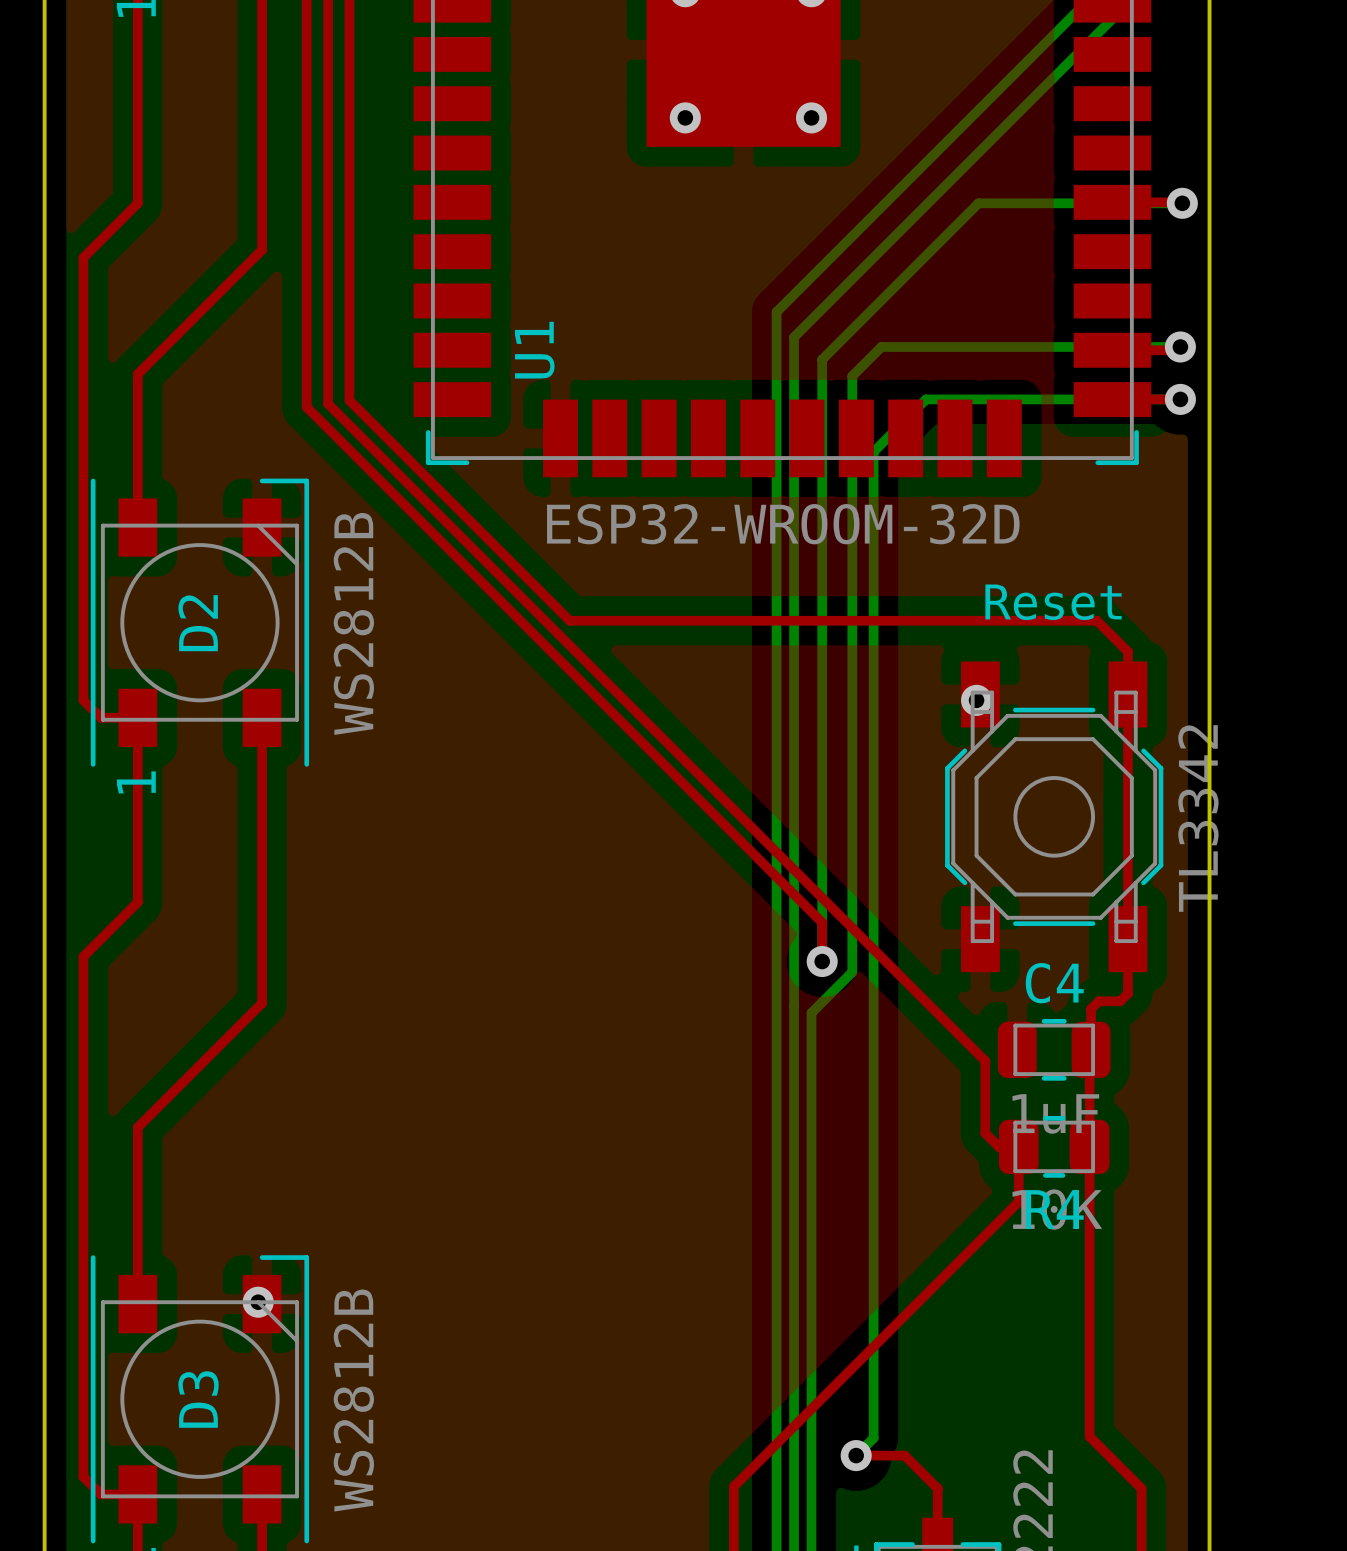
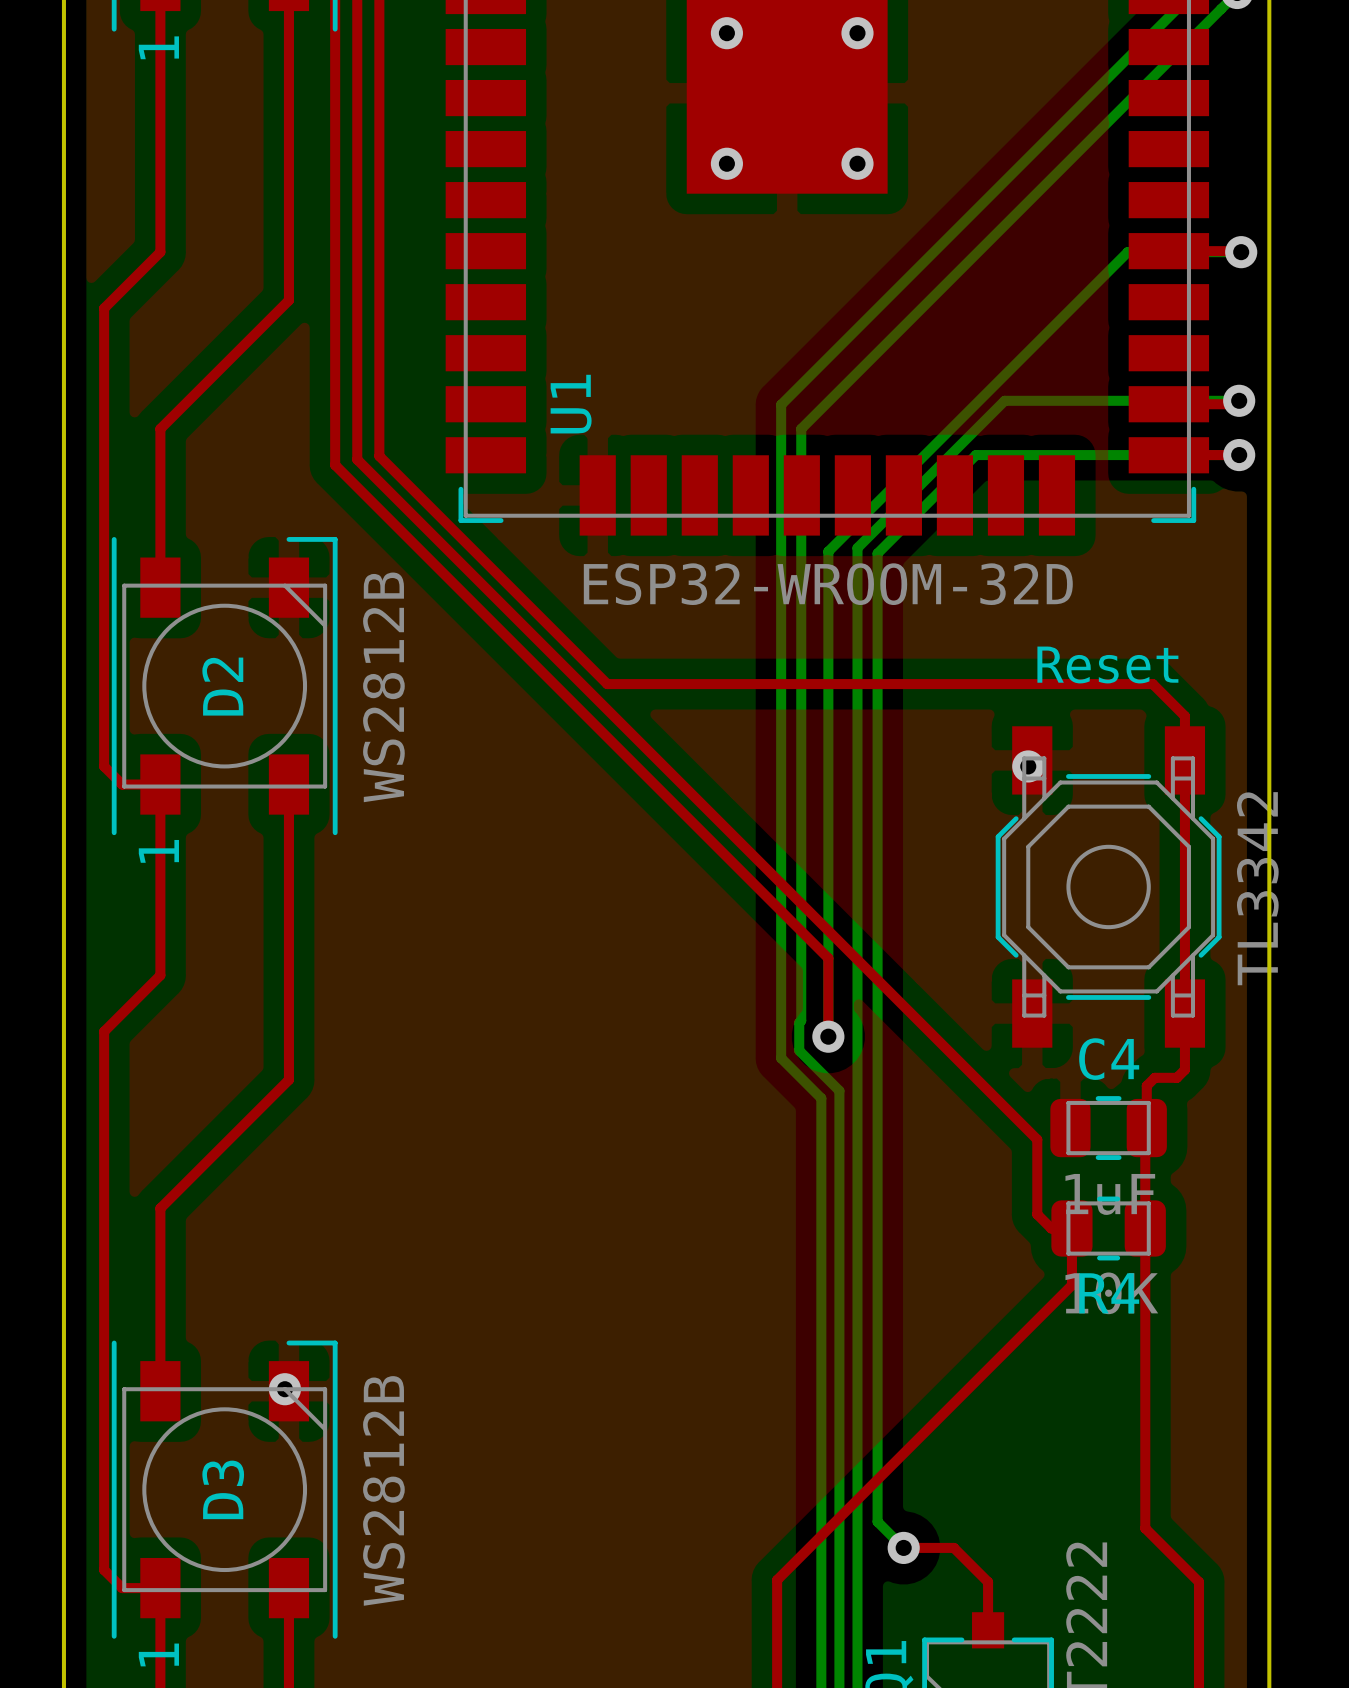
bottom track: (1072, 203) (978, 203) (822, 359) (822, 961) -> (1127, 252) (828, 551) (828, 1036)
bottom track: (776, 312) (776, 1021) -> (821, 364) (781, 404) (781, 1058) (821, 1098)
bottom track: (794, 337) (794, 1013) -> (839, 390) (801, 428) (801, 1020) (799, 1022) (799, 1050) (839, 1090)
bottom track: (953, 346) (881, 346) (852, 376) (852, 972) (811, 1012) -> (1004, 400) (857, 548) (857, 1089)
top track: (306, 407) (822, 922) (822, 961) -> (335, 463) (828, 958) (828, 1036)
bottom track: (873, 451) (873, 1438) (856, 1455) -> (921, 509) (877, 553) (877, 1521) (903, 1547)
via position: (822, 961) -> (828, 1036)

